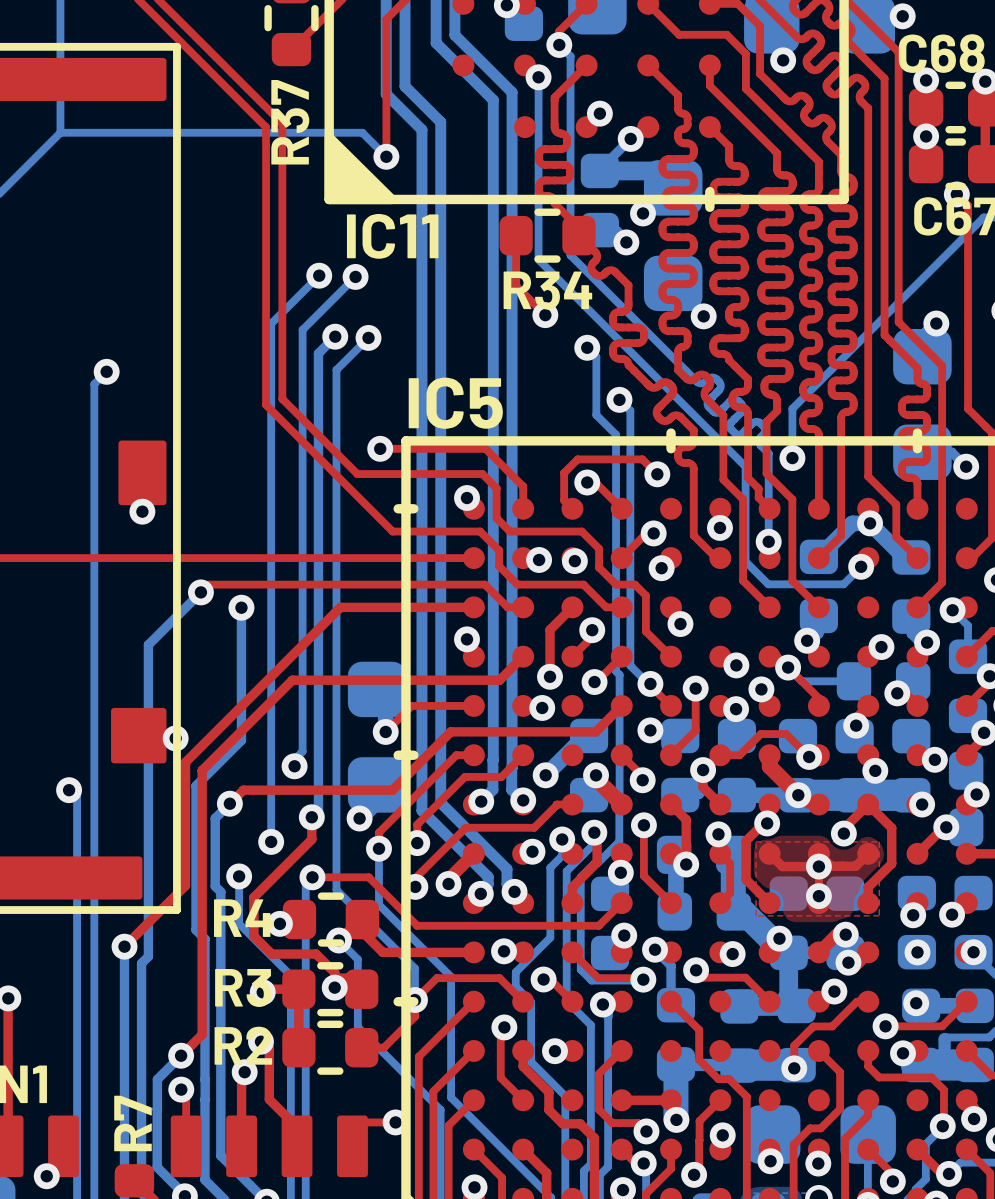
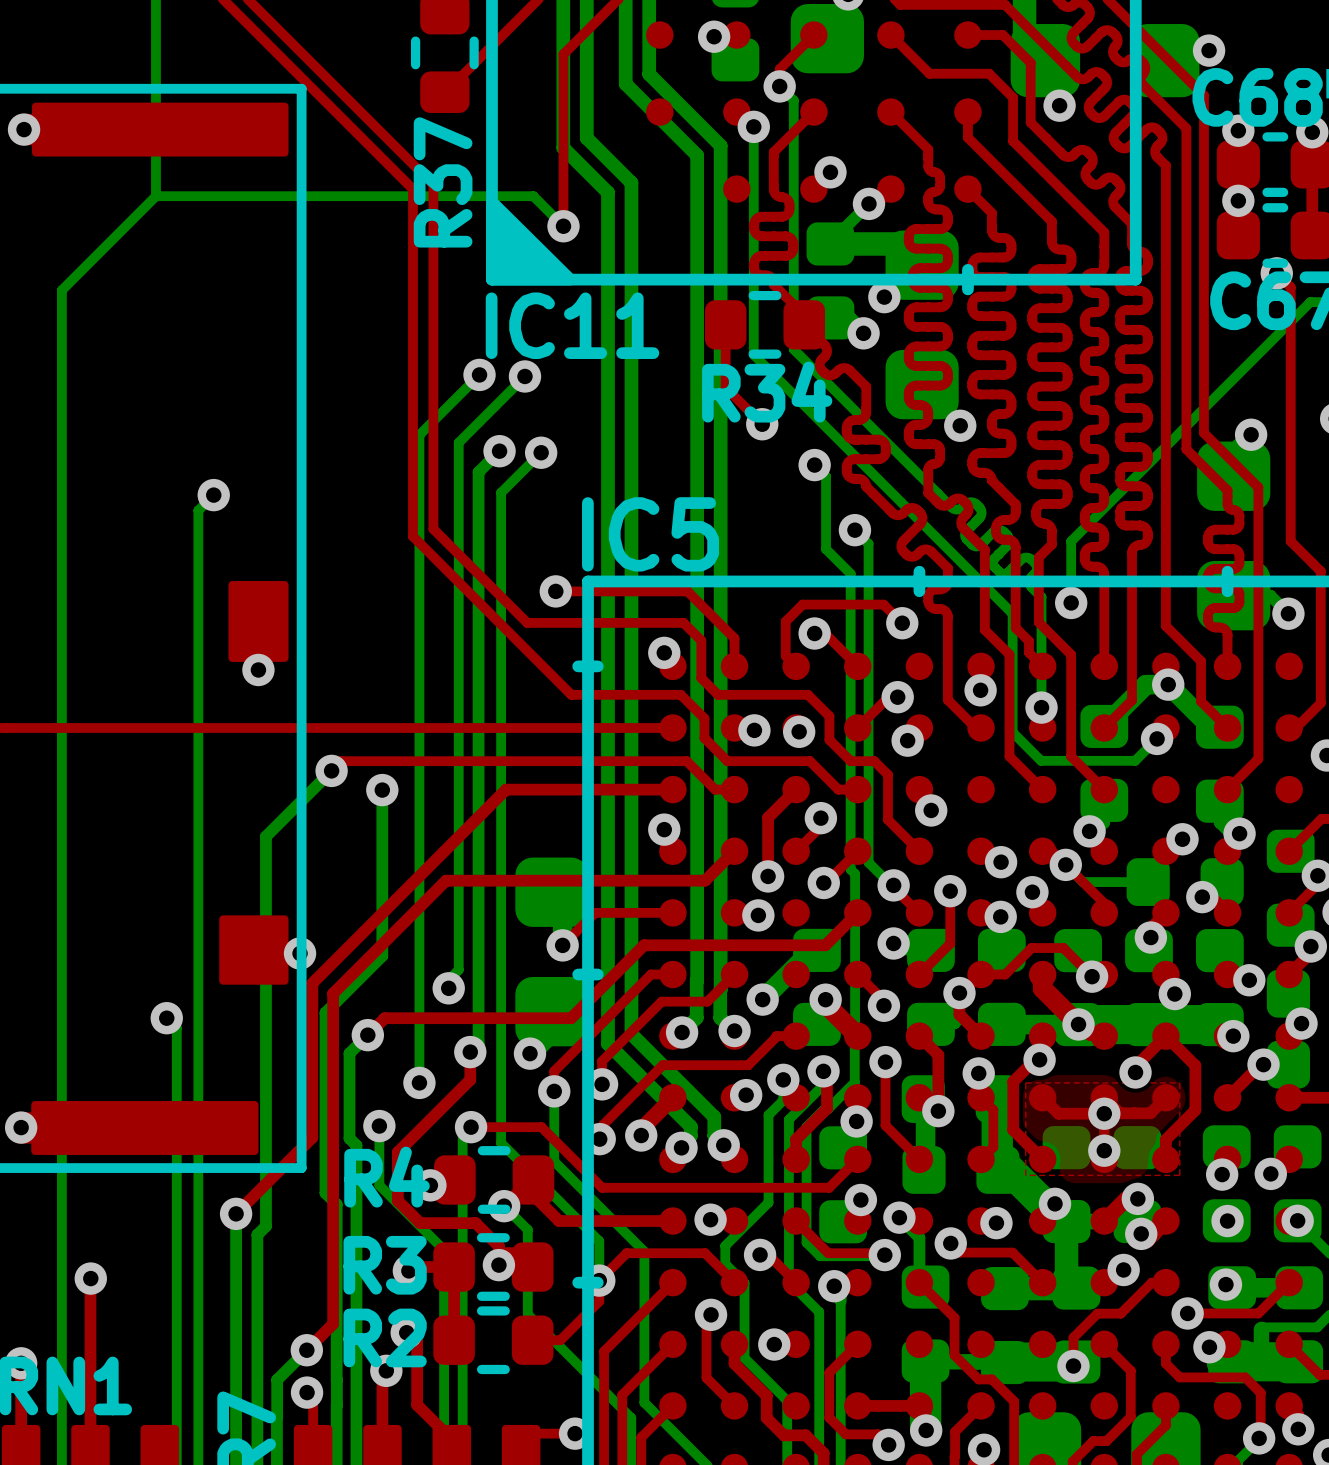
bottom track: (952, 610) (968, 625) (968, 656) -> none
via: (952, 610) -> none

